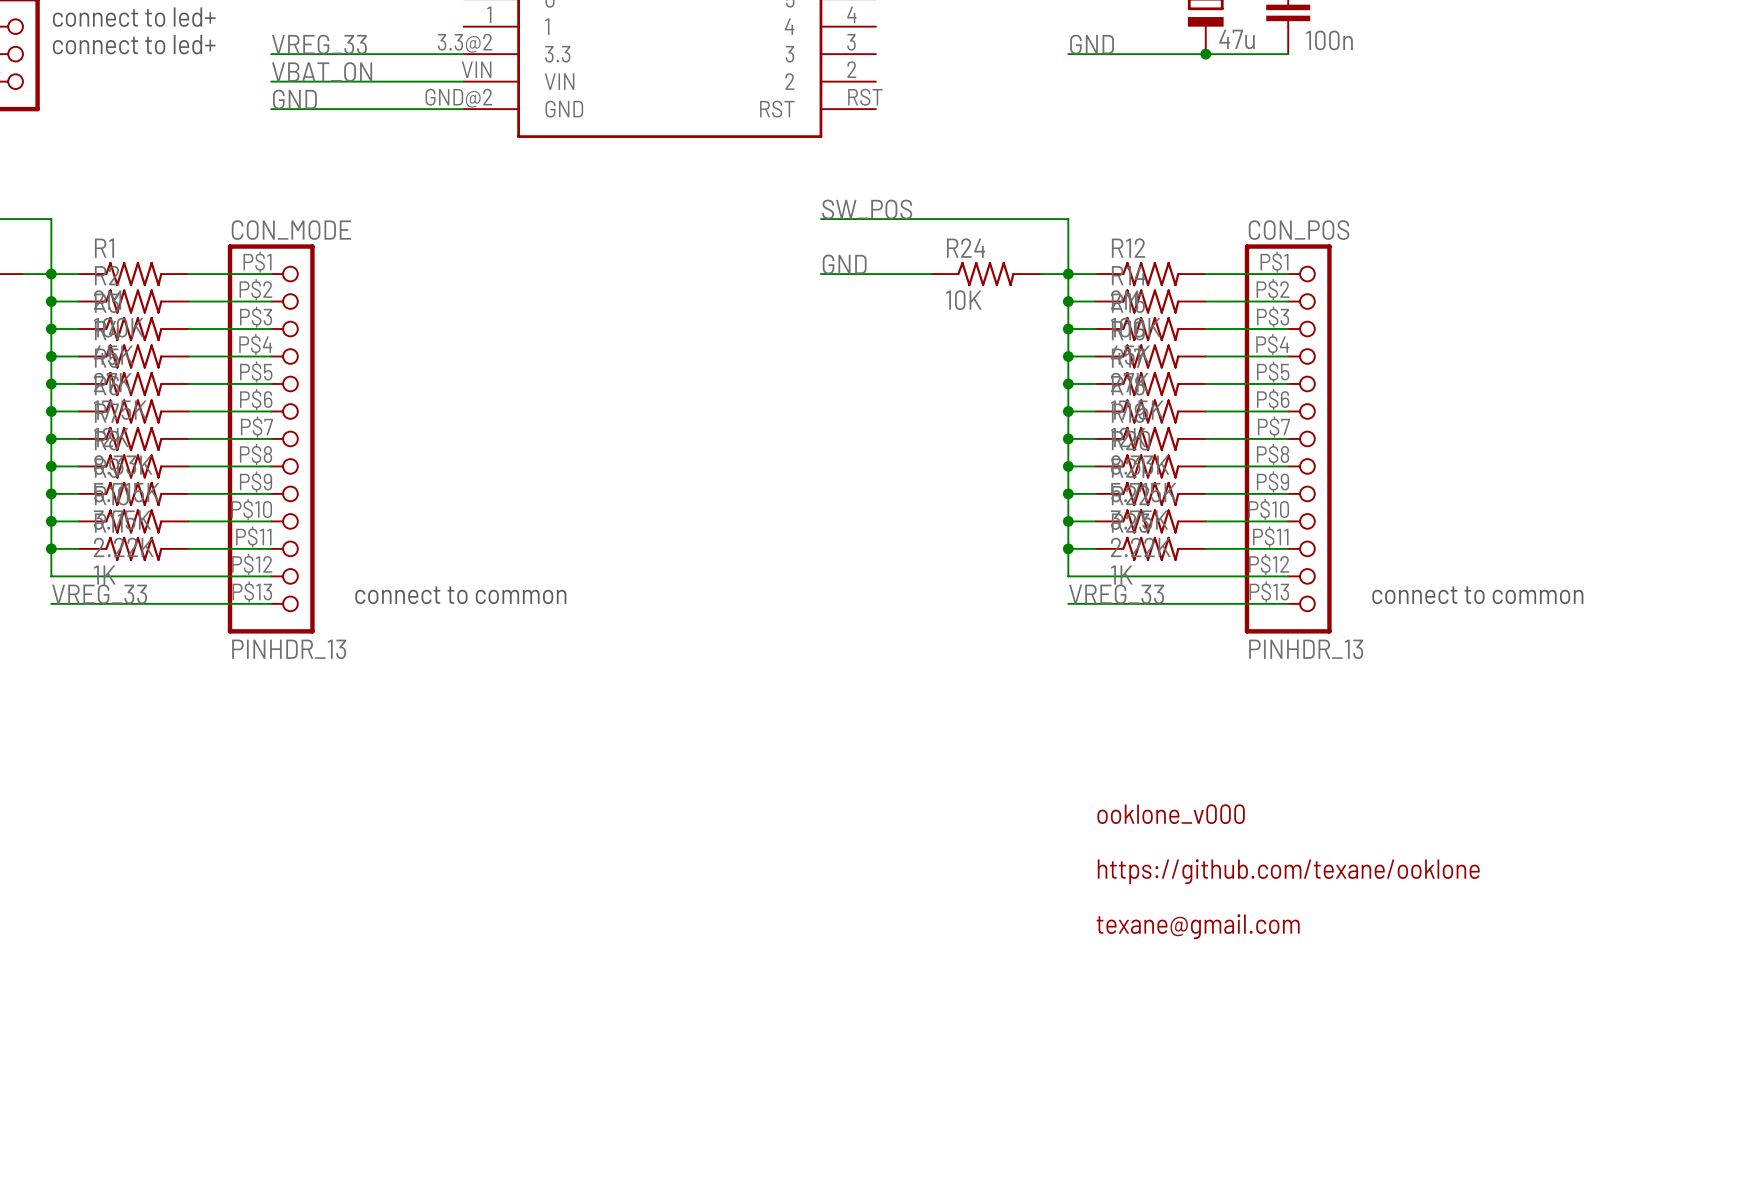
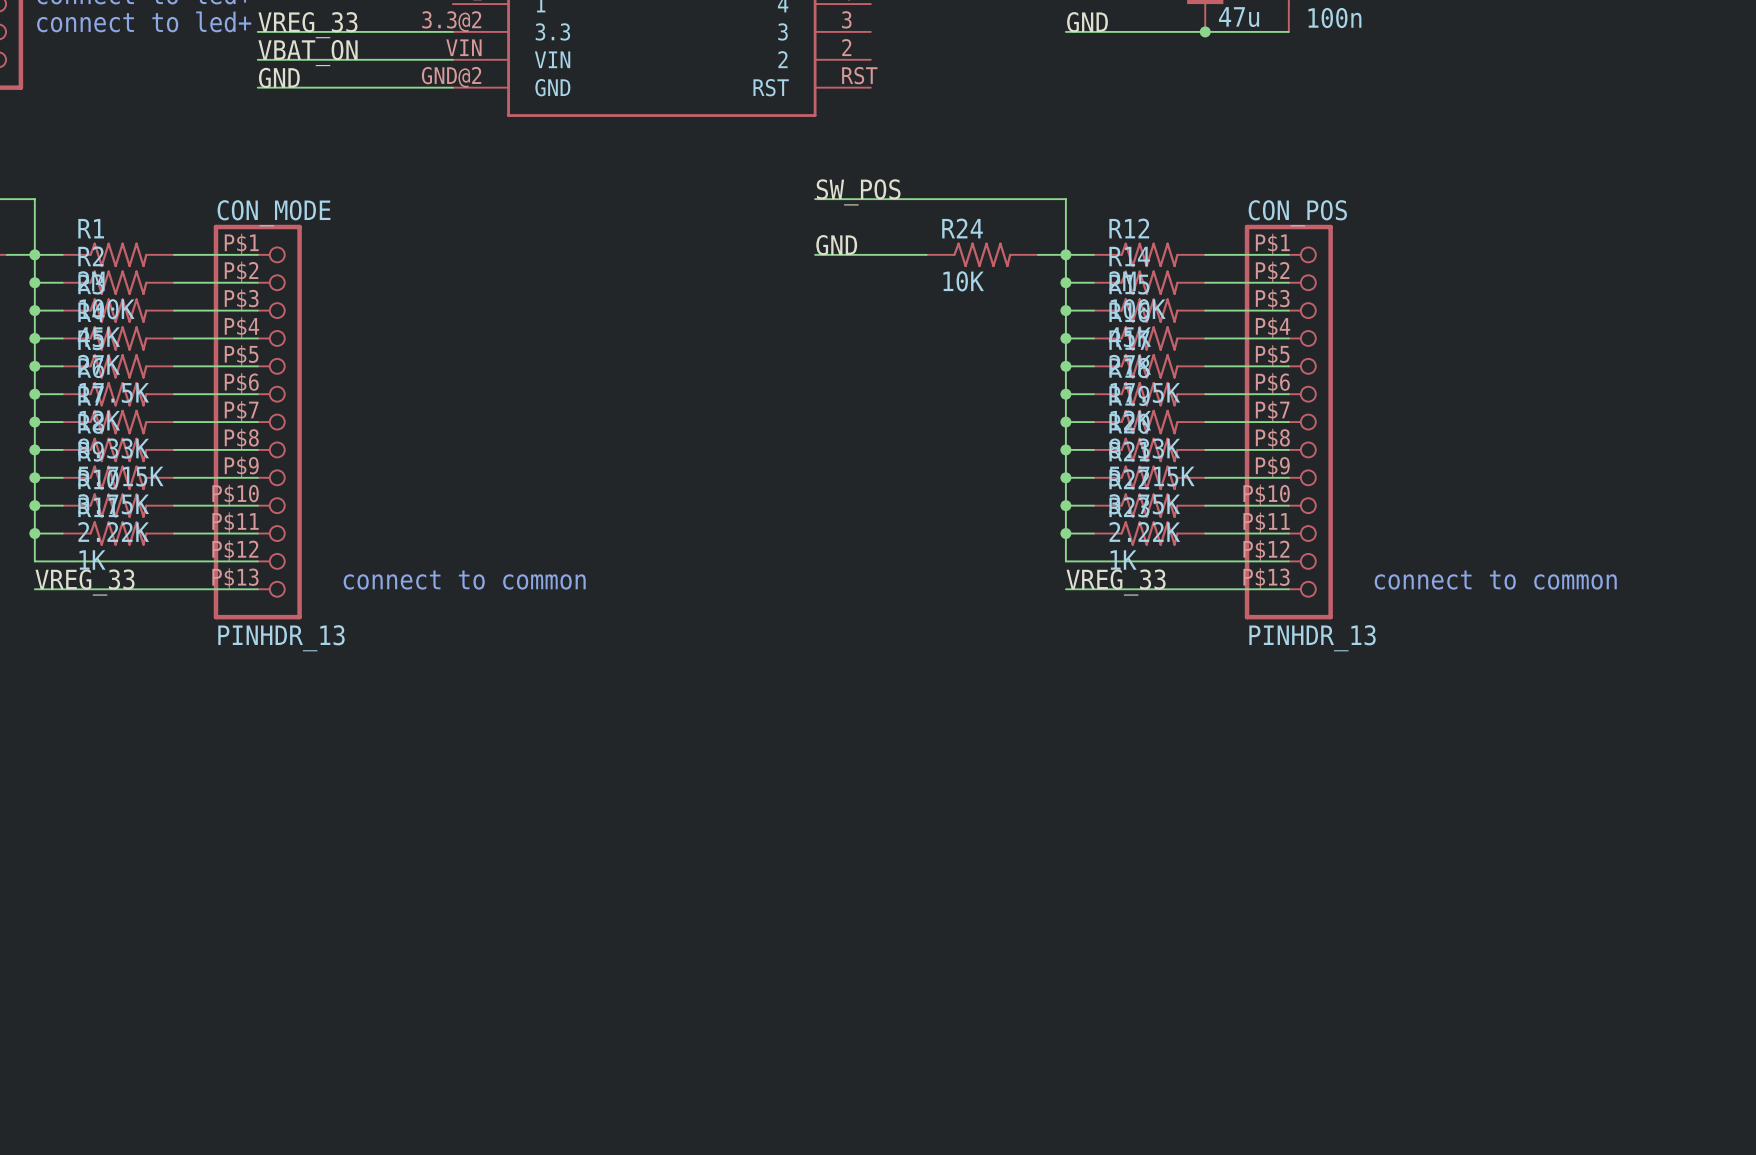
text: ooklone_v000 (1171, 814) -> none
text: https://github.com/texane/ooklone (1288, 871) -> none
text: texane@gmail.com (1198, 926) -> none

